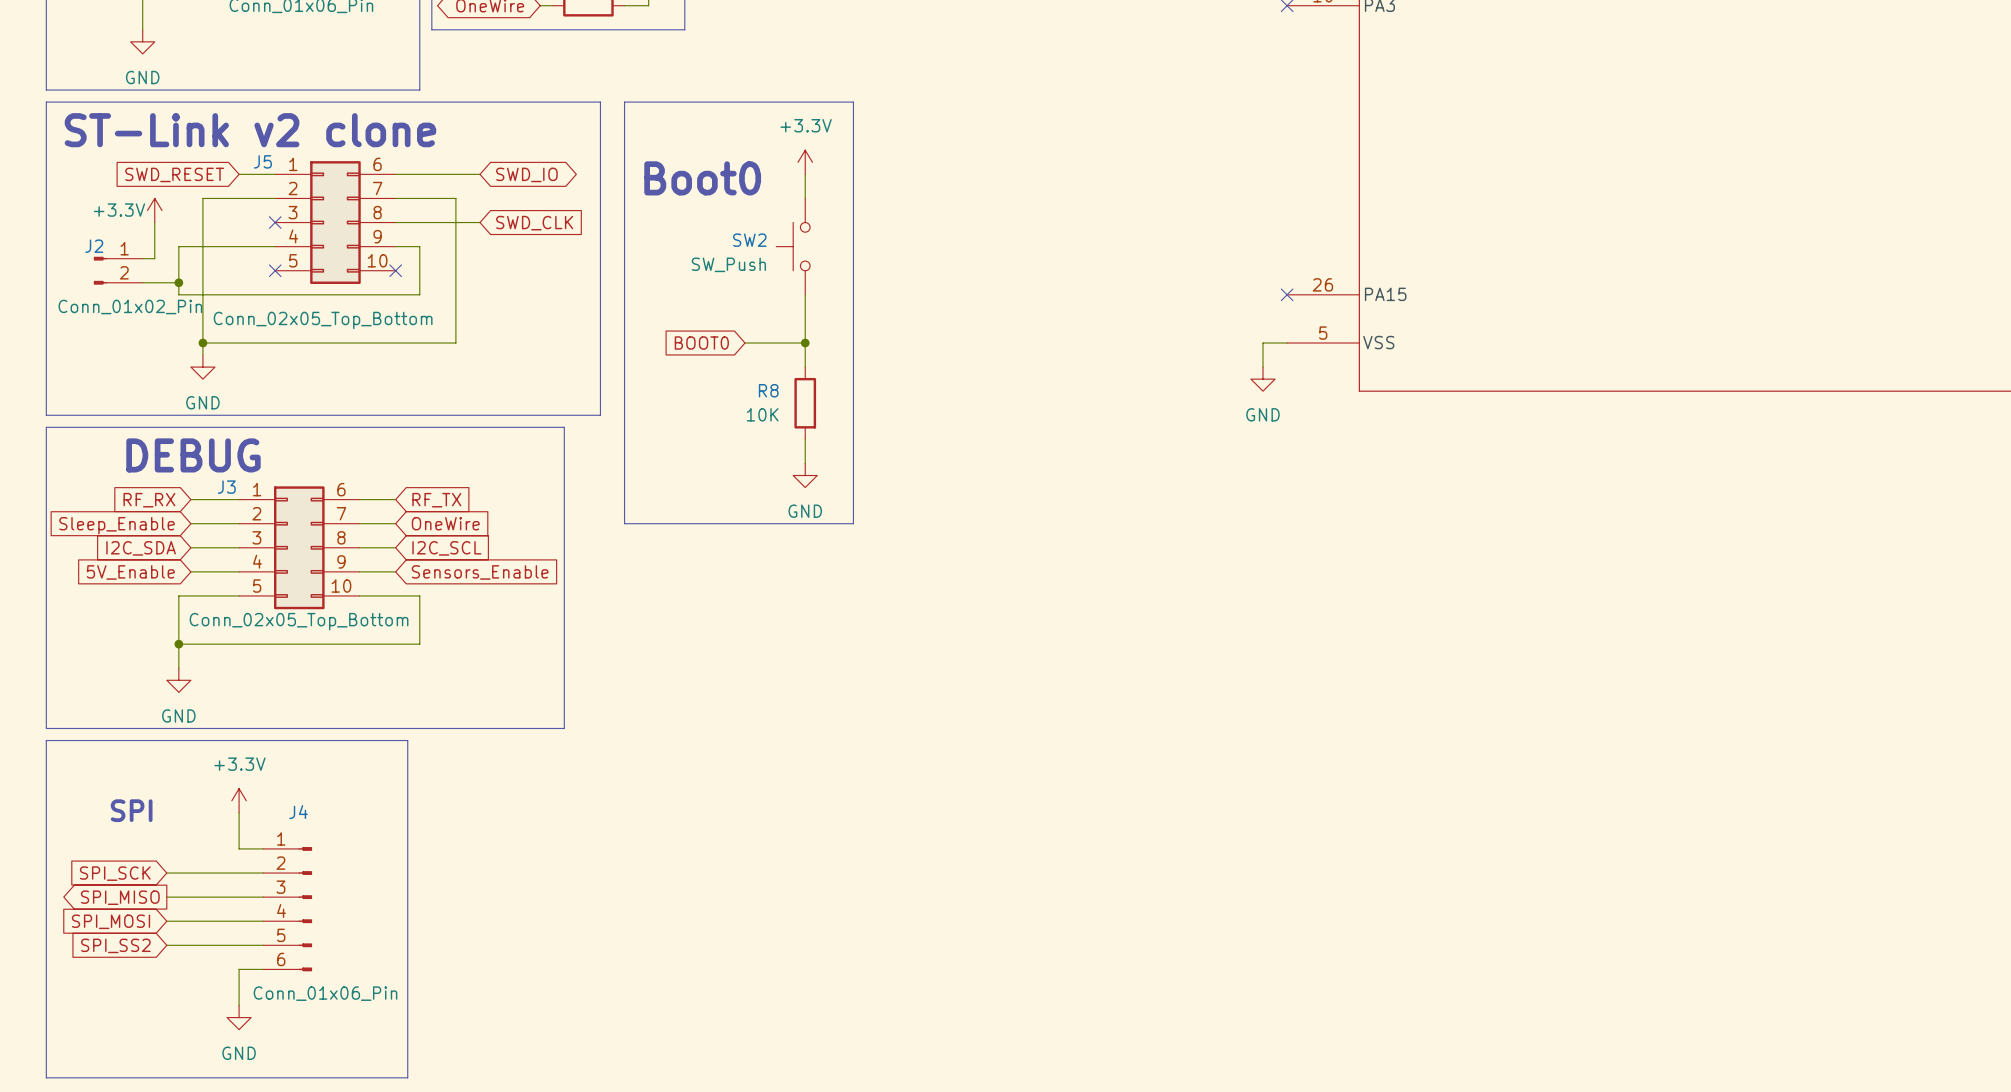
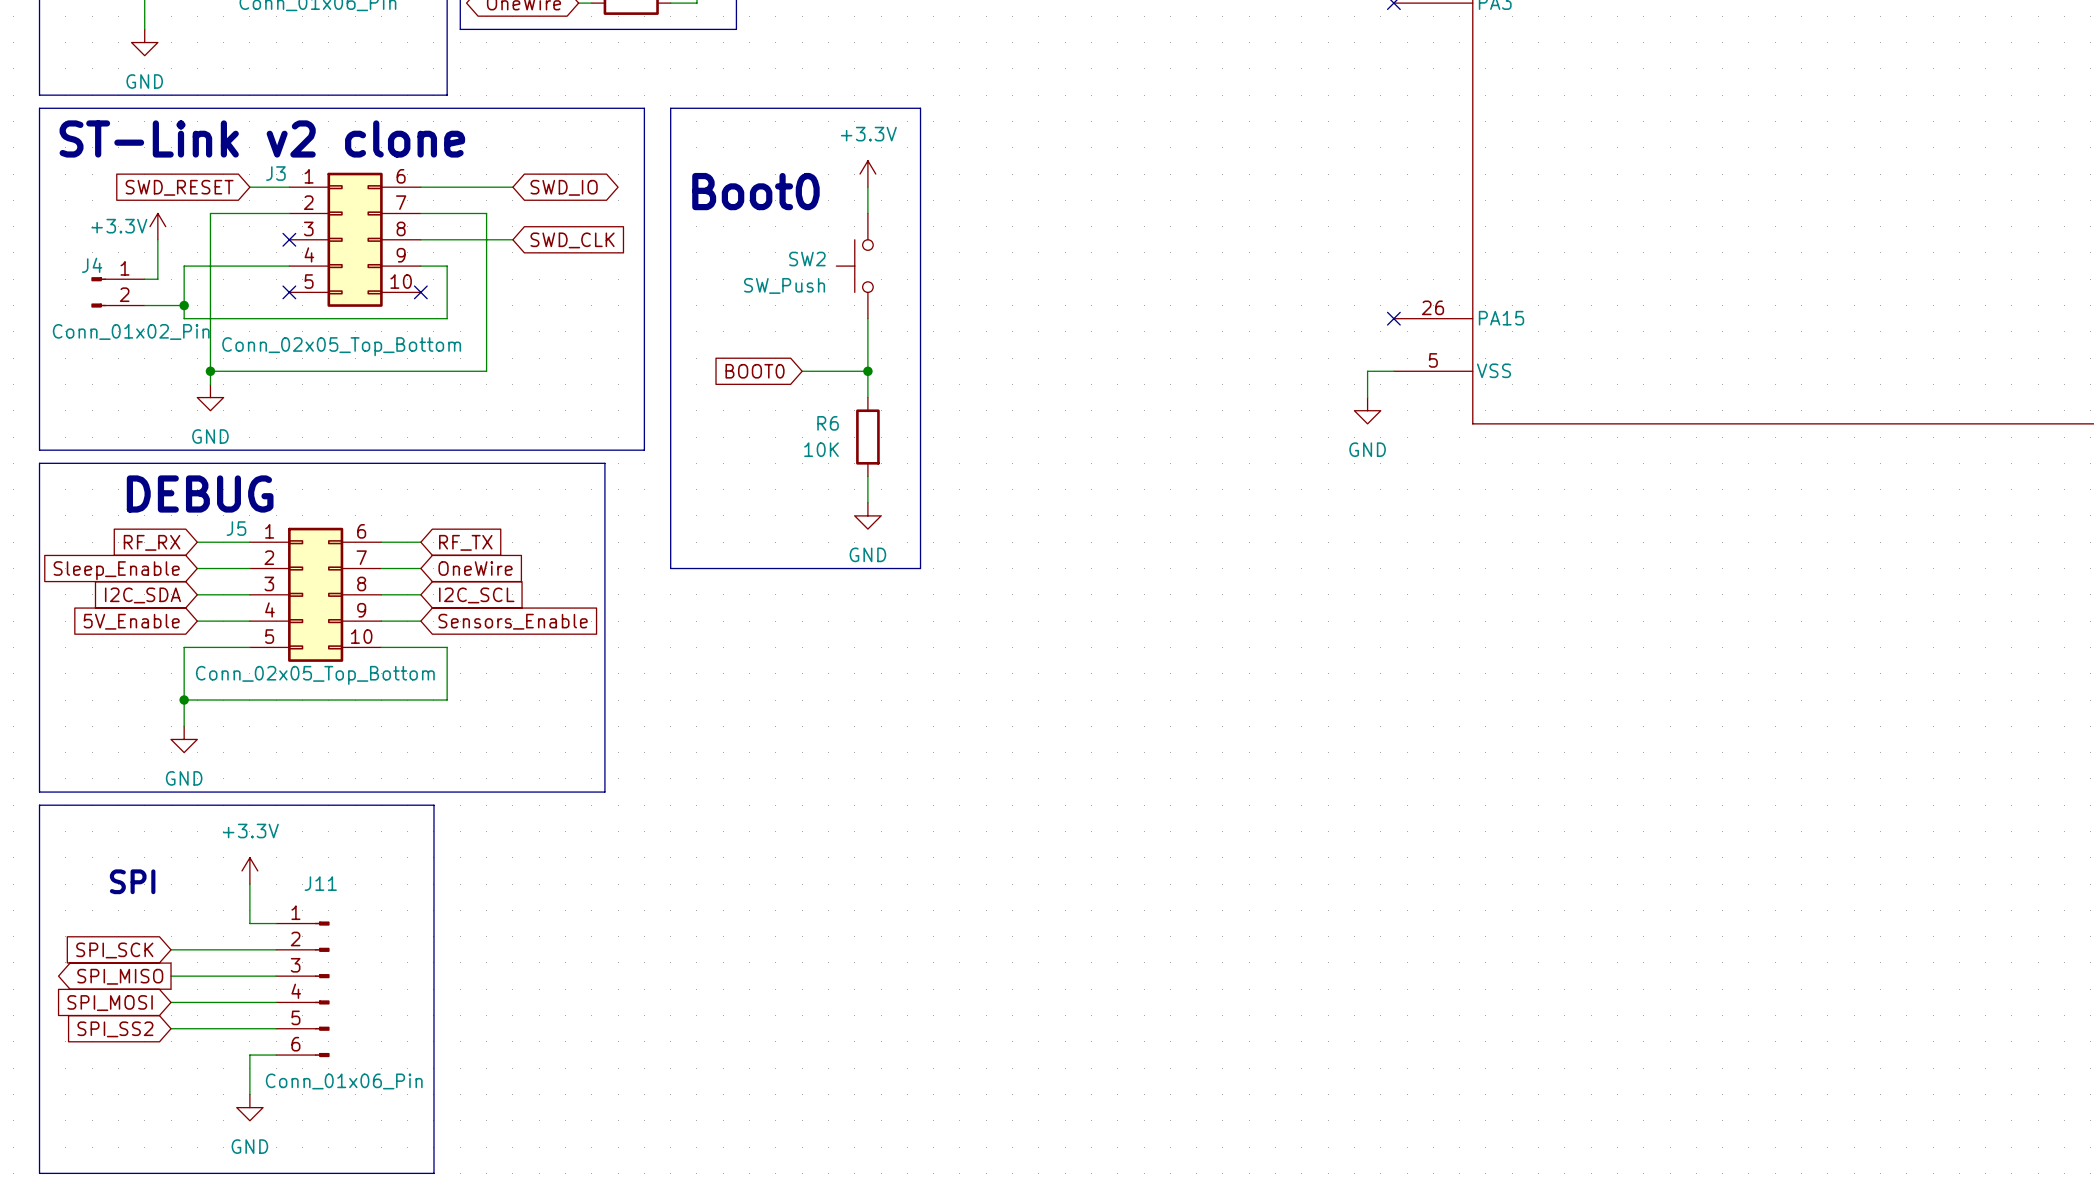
J5 name: J5 (262, 161) -> J3 (275, 173)
J2 name: J2 (94, 246) -> J4 (92, 265)
R8 name: R8 (768, 390) -> R6 (828, 423)
J3 name: J3 (226, 487) -> J5 (236, 528)
J4 name: J4 (298, 812) -> J11 (320, 883)

